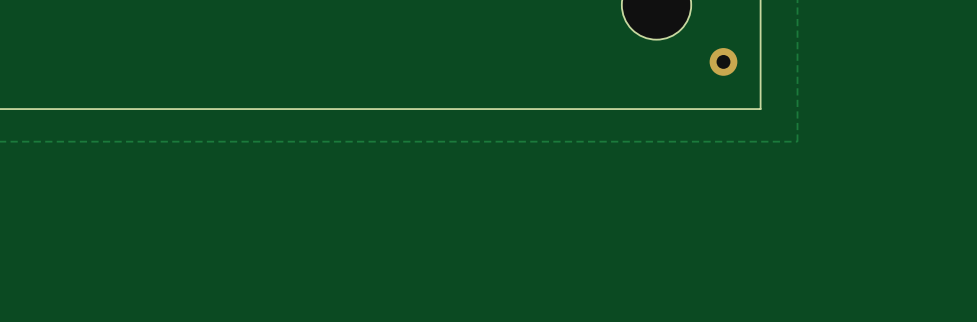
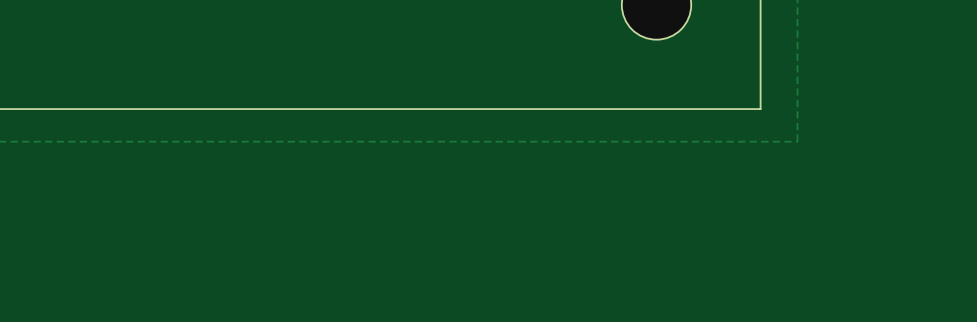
via: (723, 61) -> none

